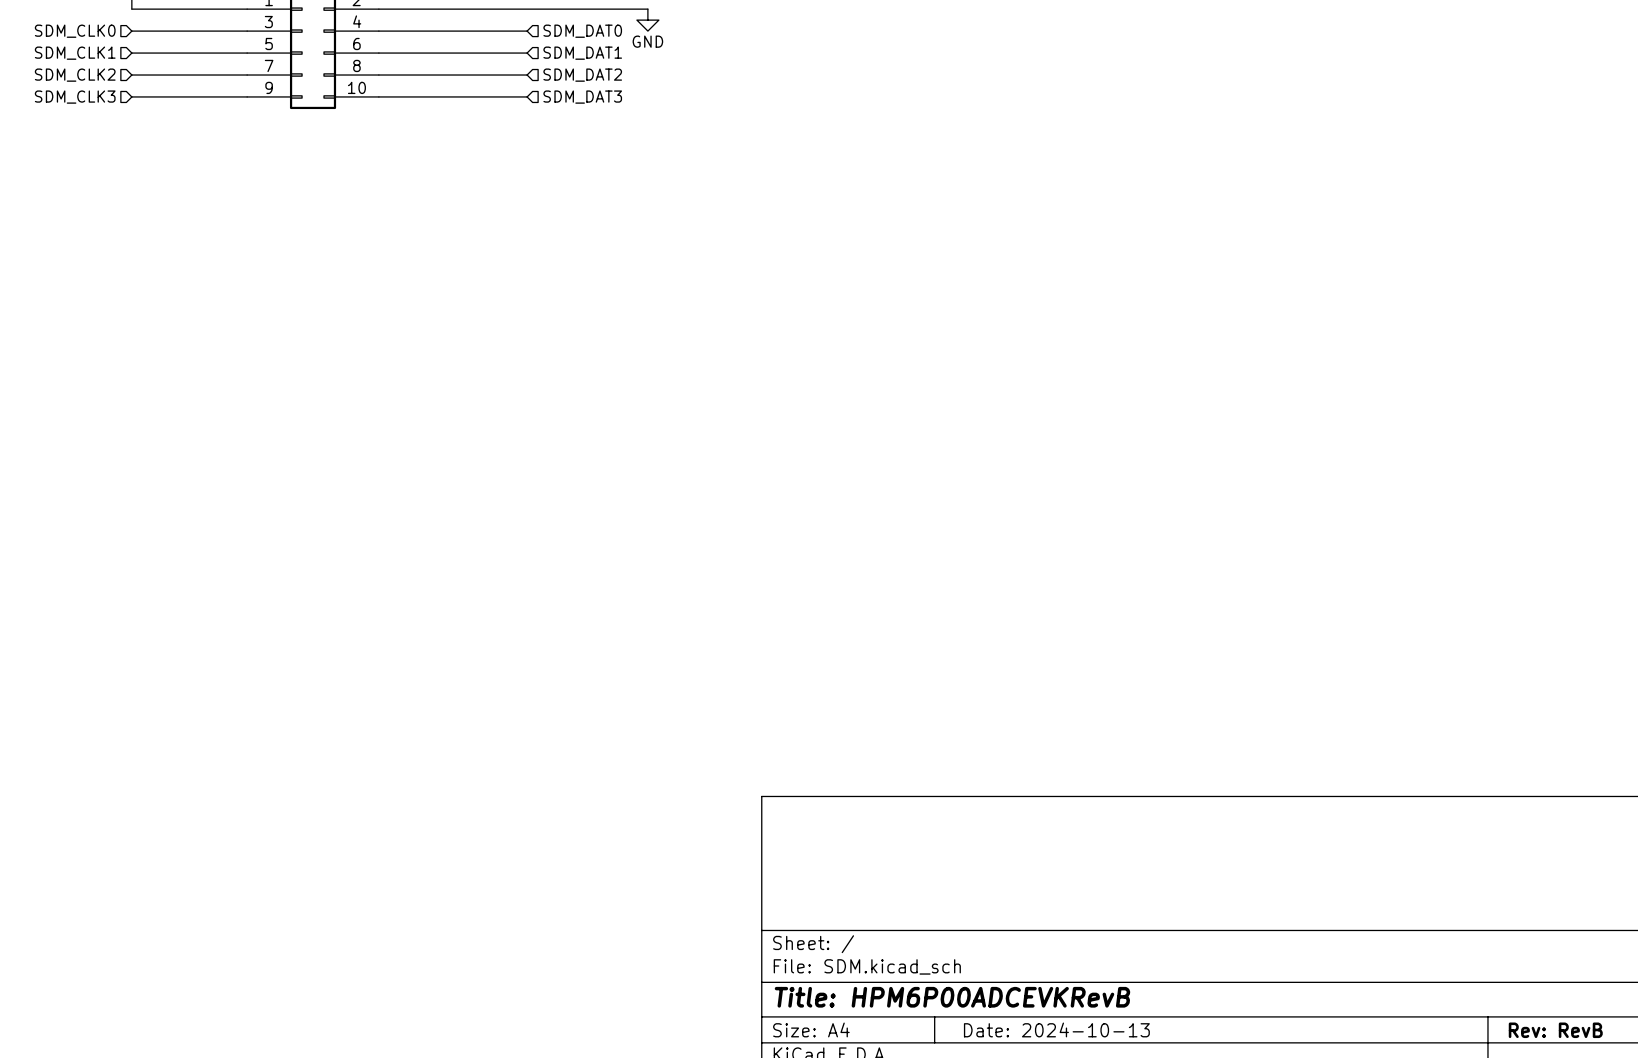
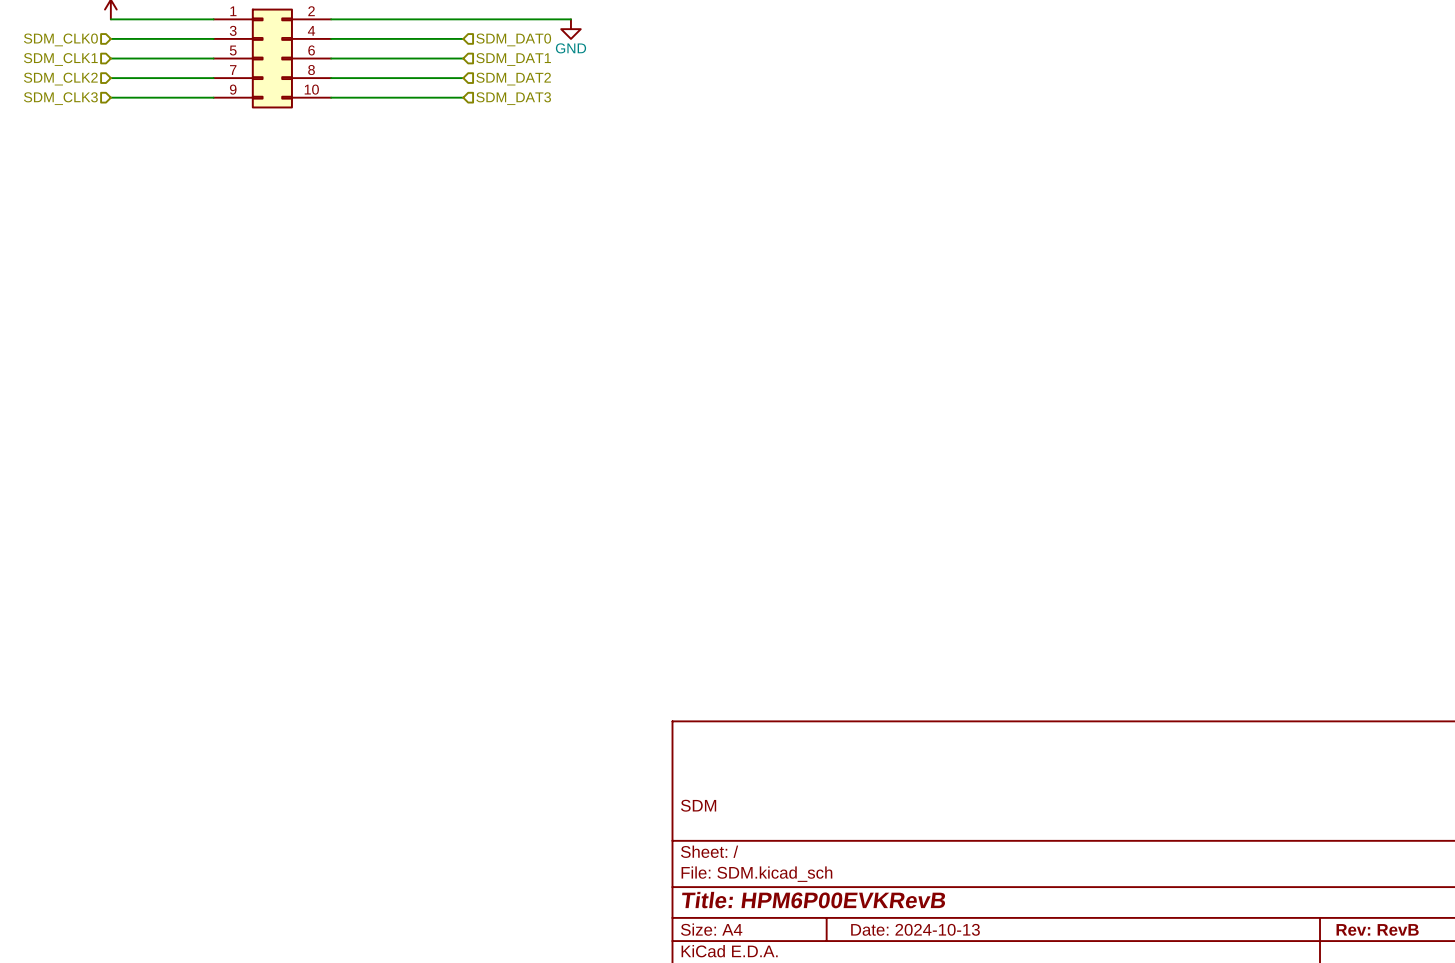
title block: none -> SDM (698, 805)
title block: Title: HPM6P00ADCEVKRevB (952, 997) -> Title: HPM6P00EVKRevB (813, 900)

